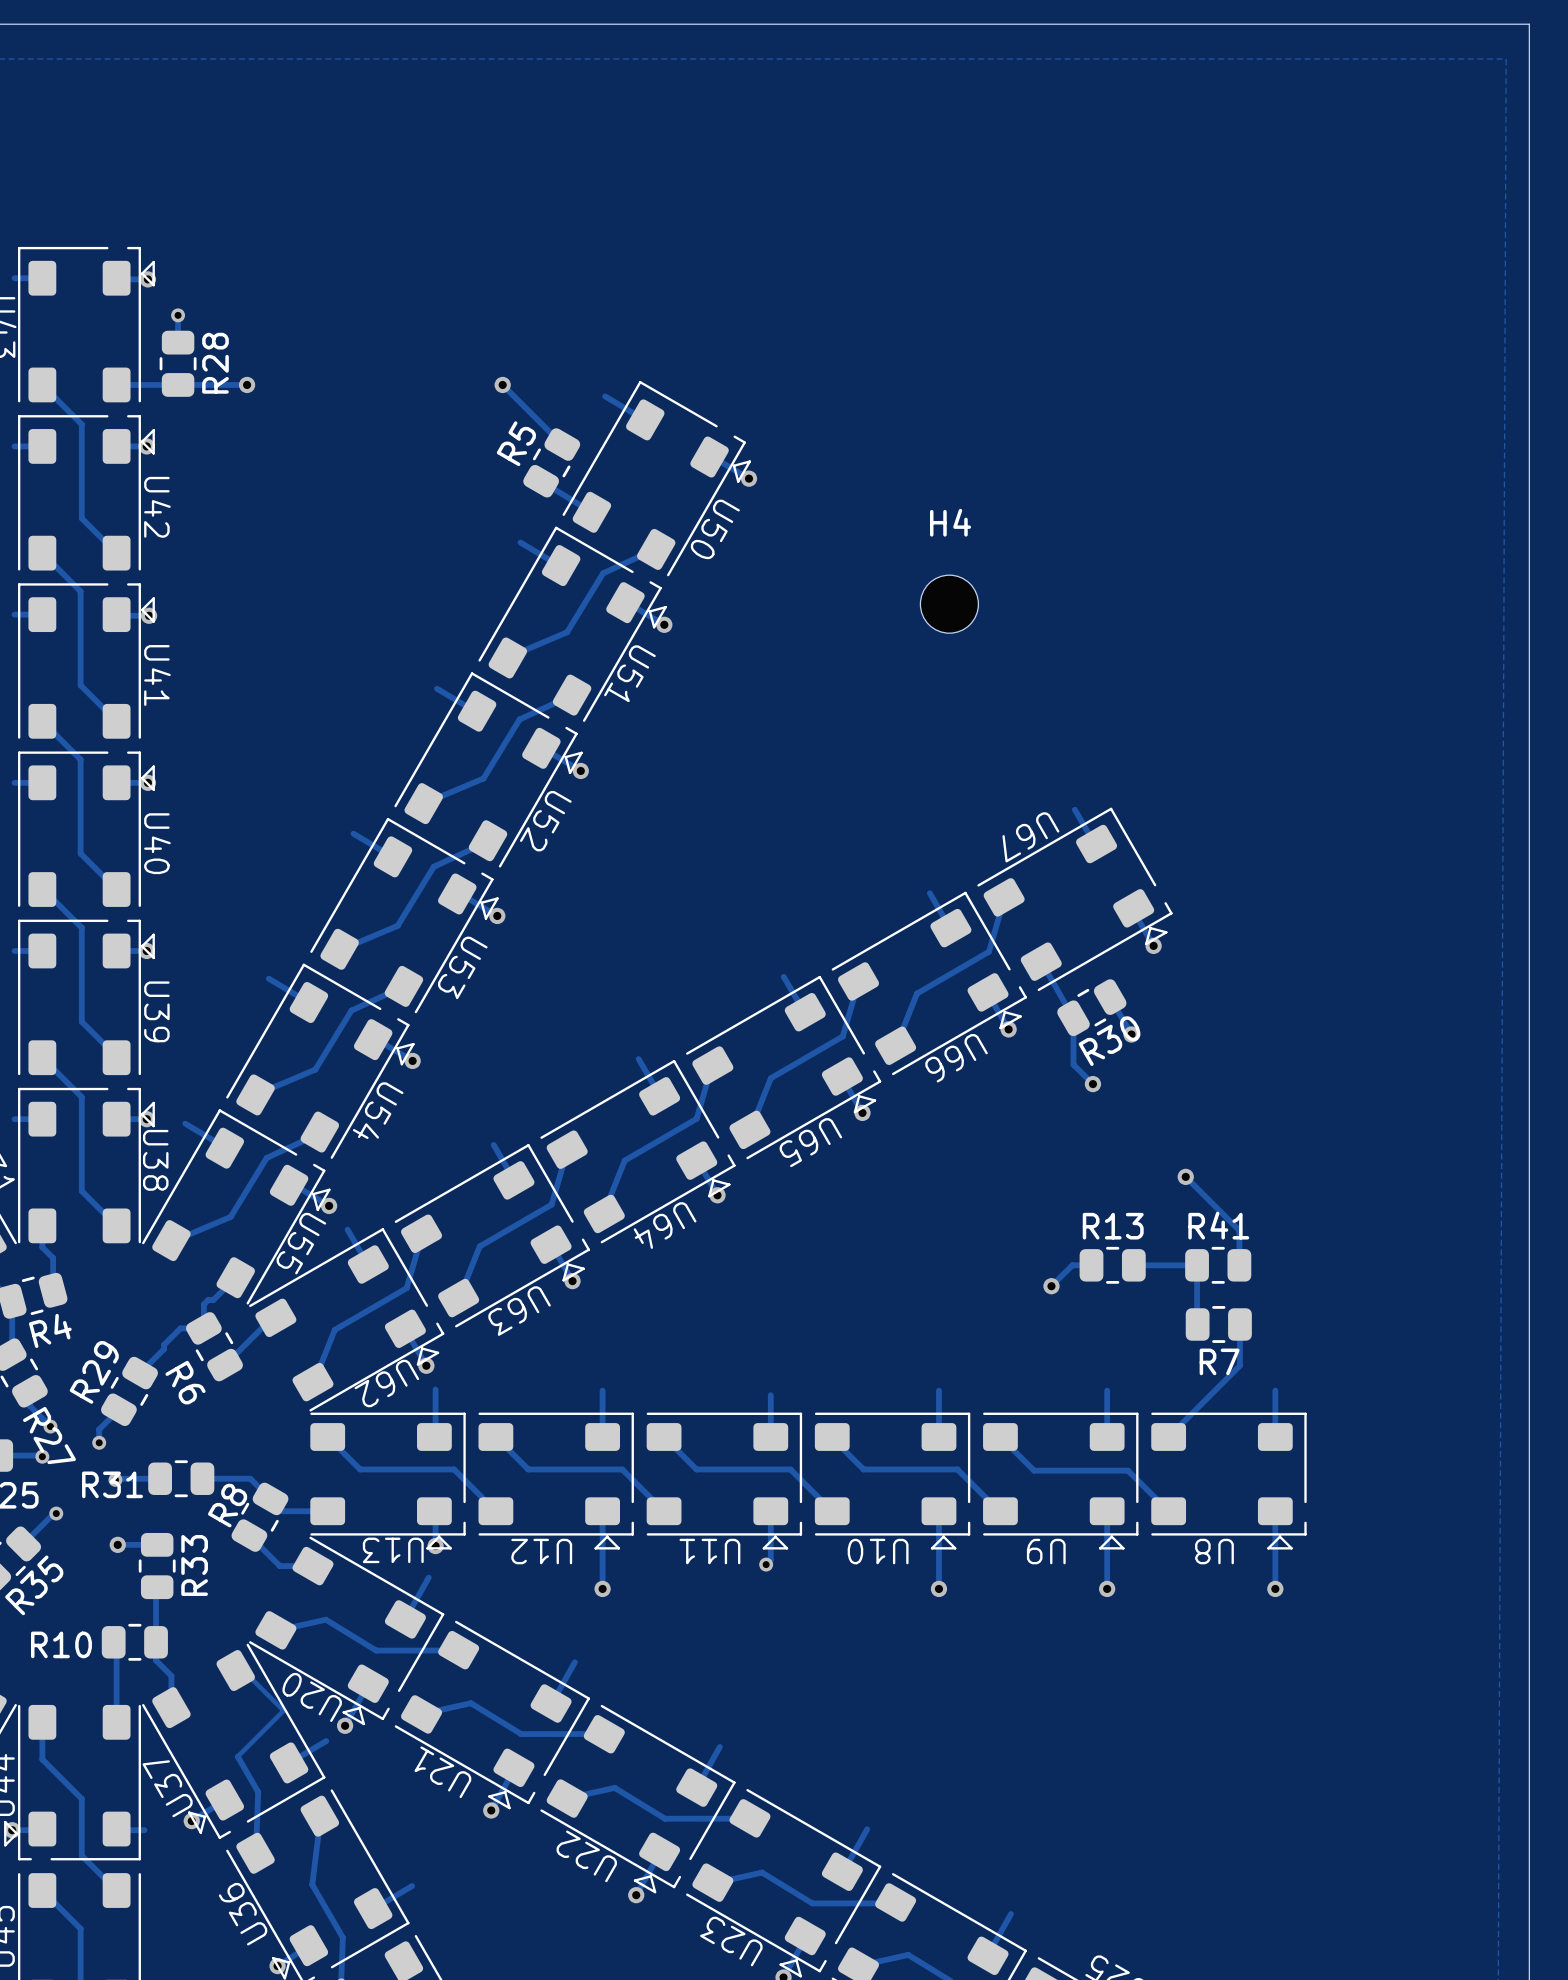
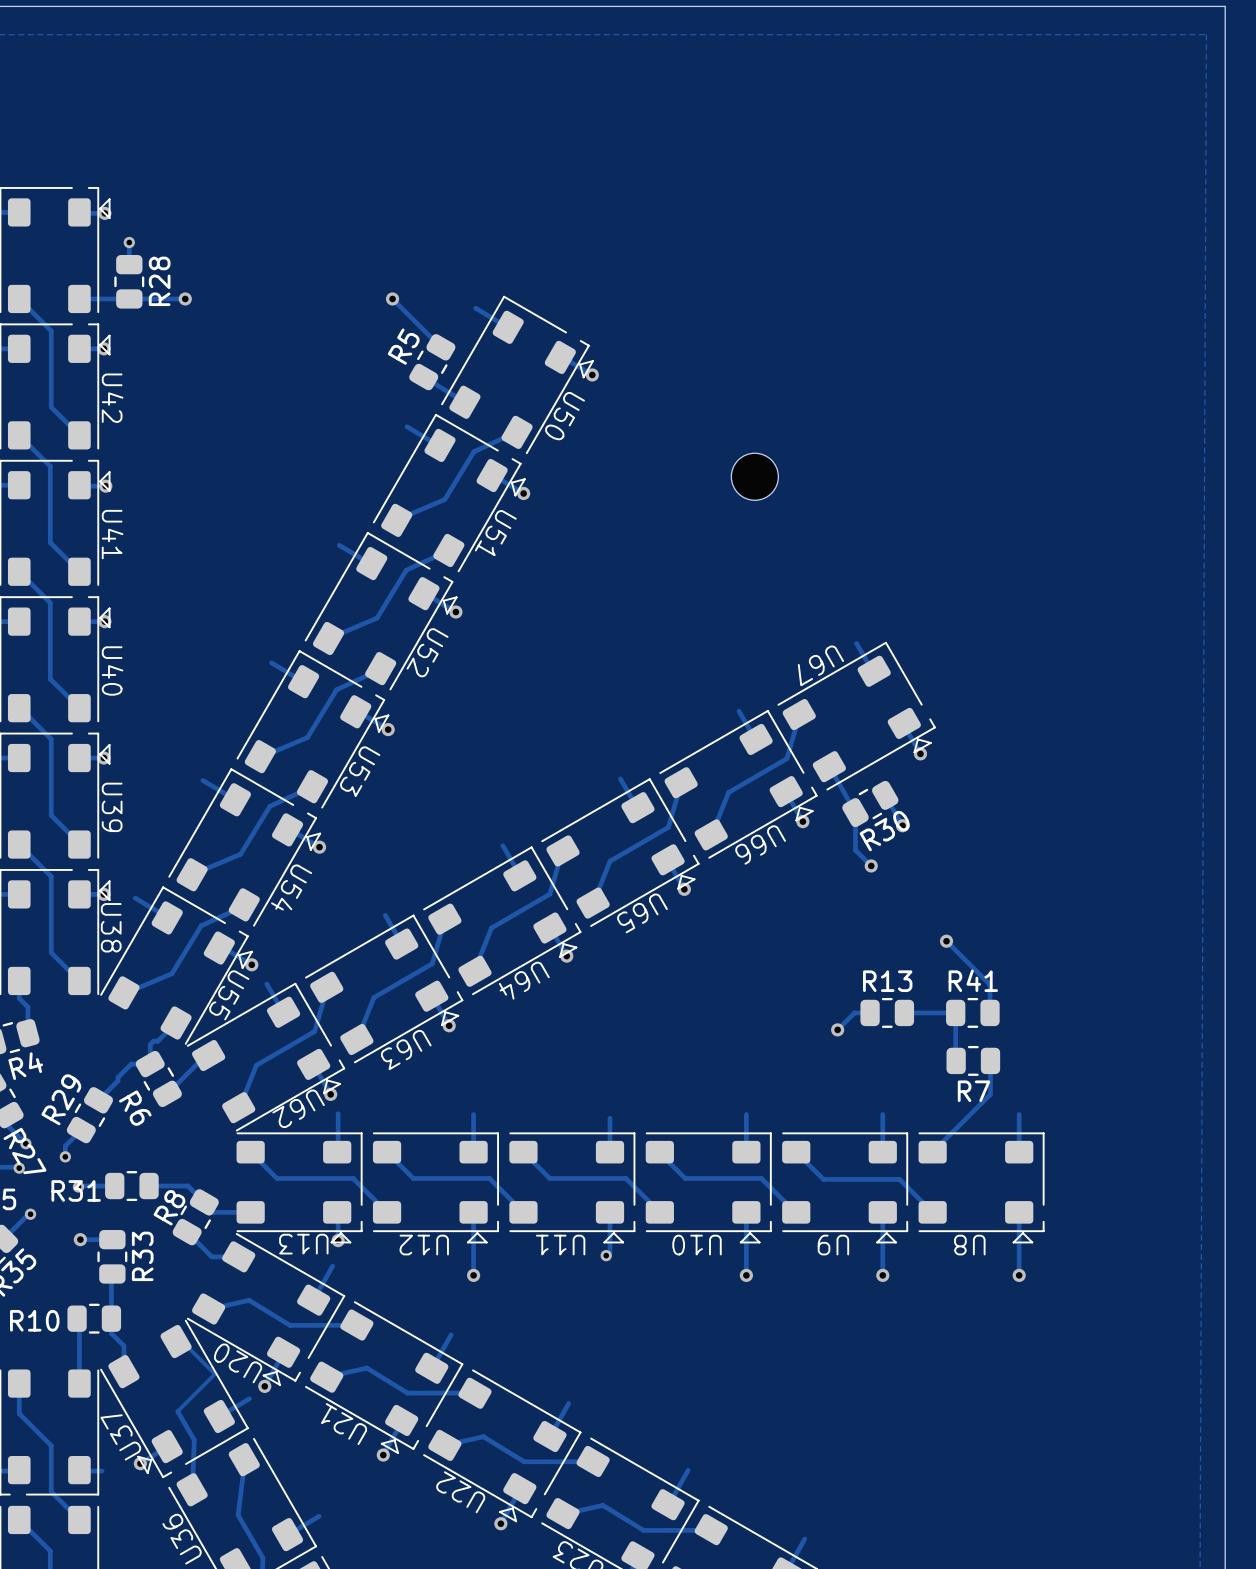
H4 name: H4 (950, 522) -> none

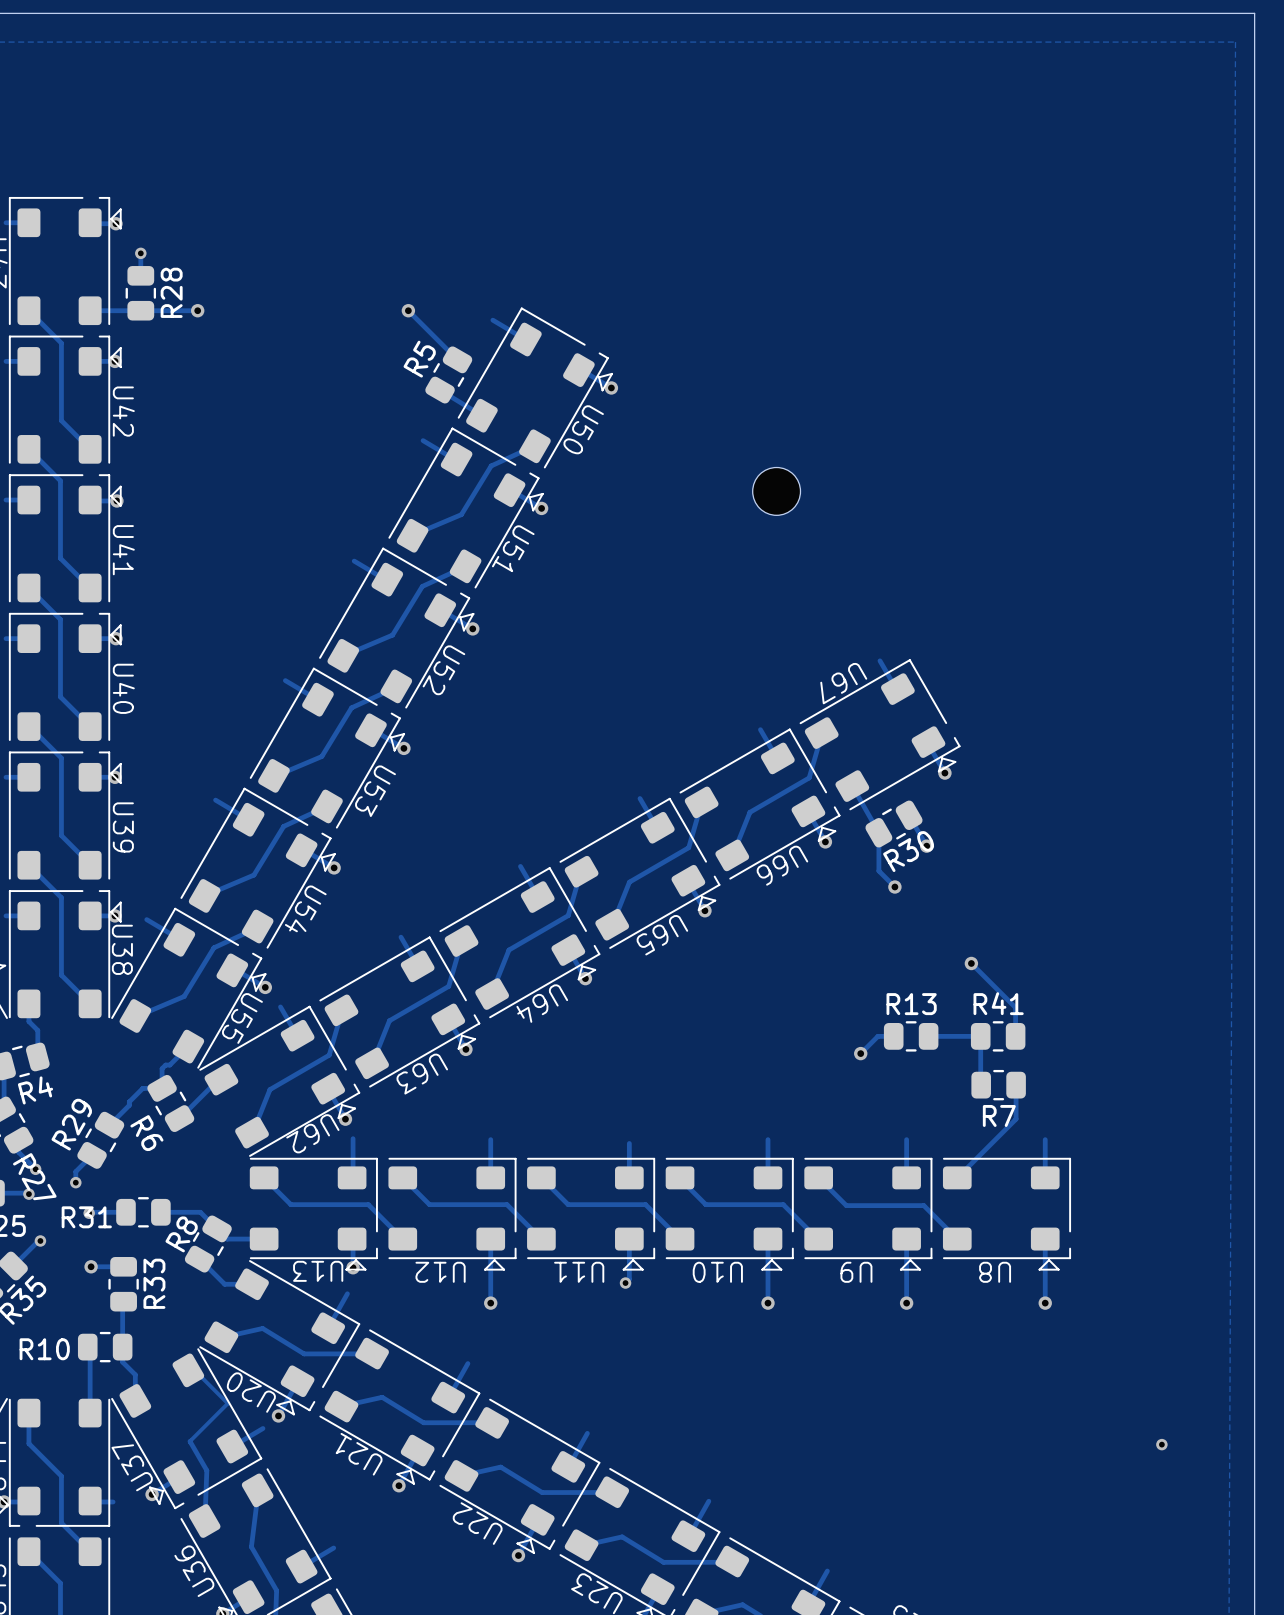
via: none -> (1161, 1444)

